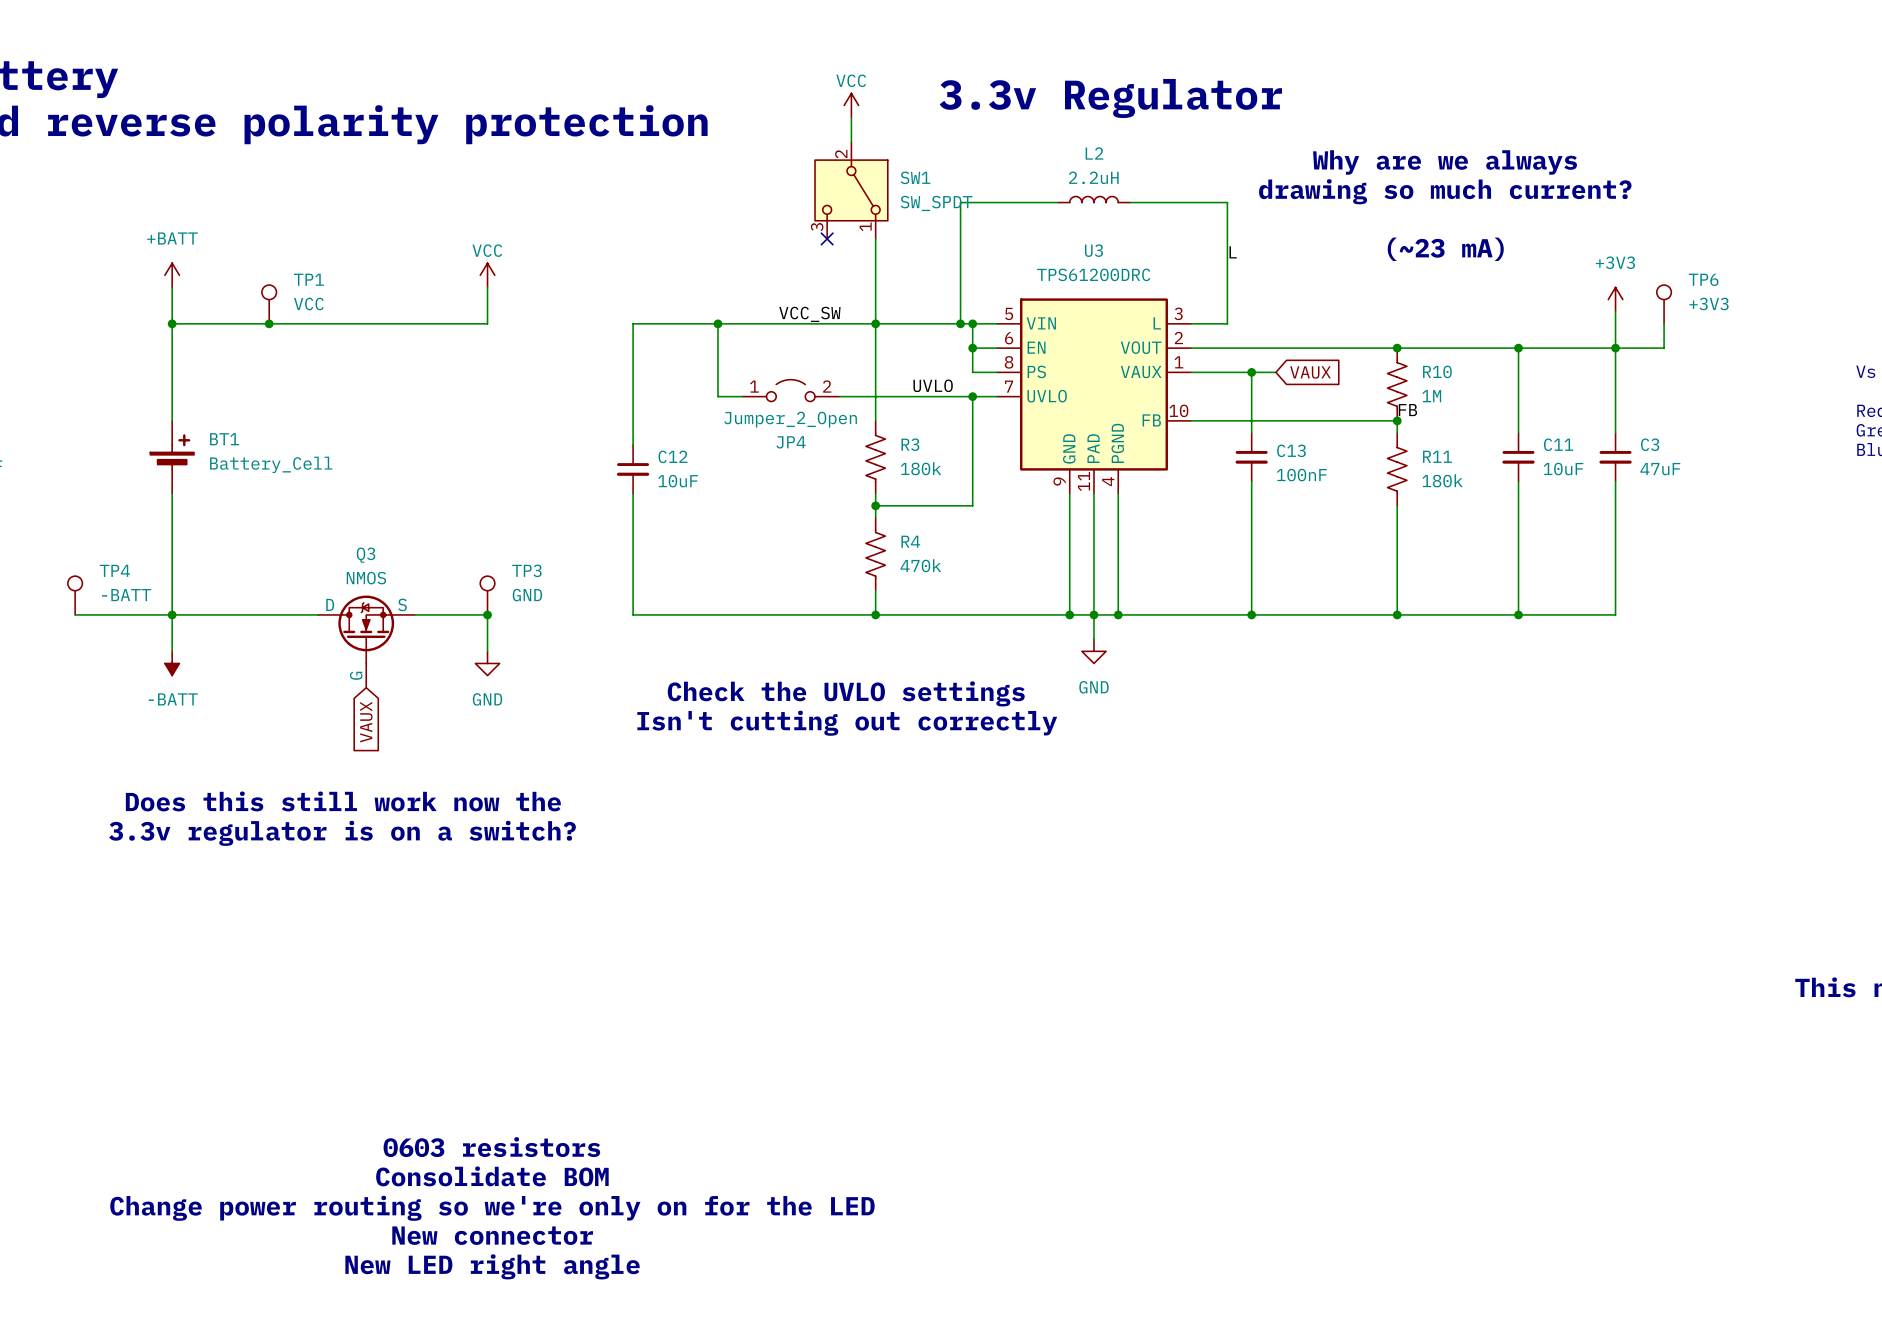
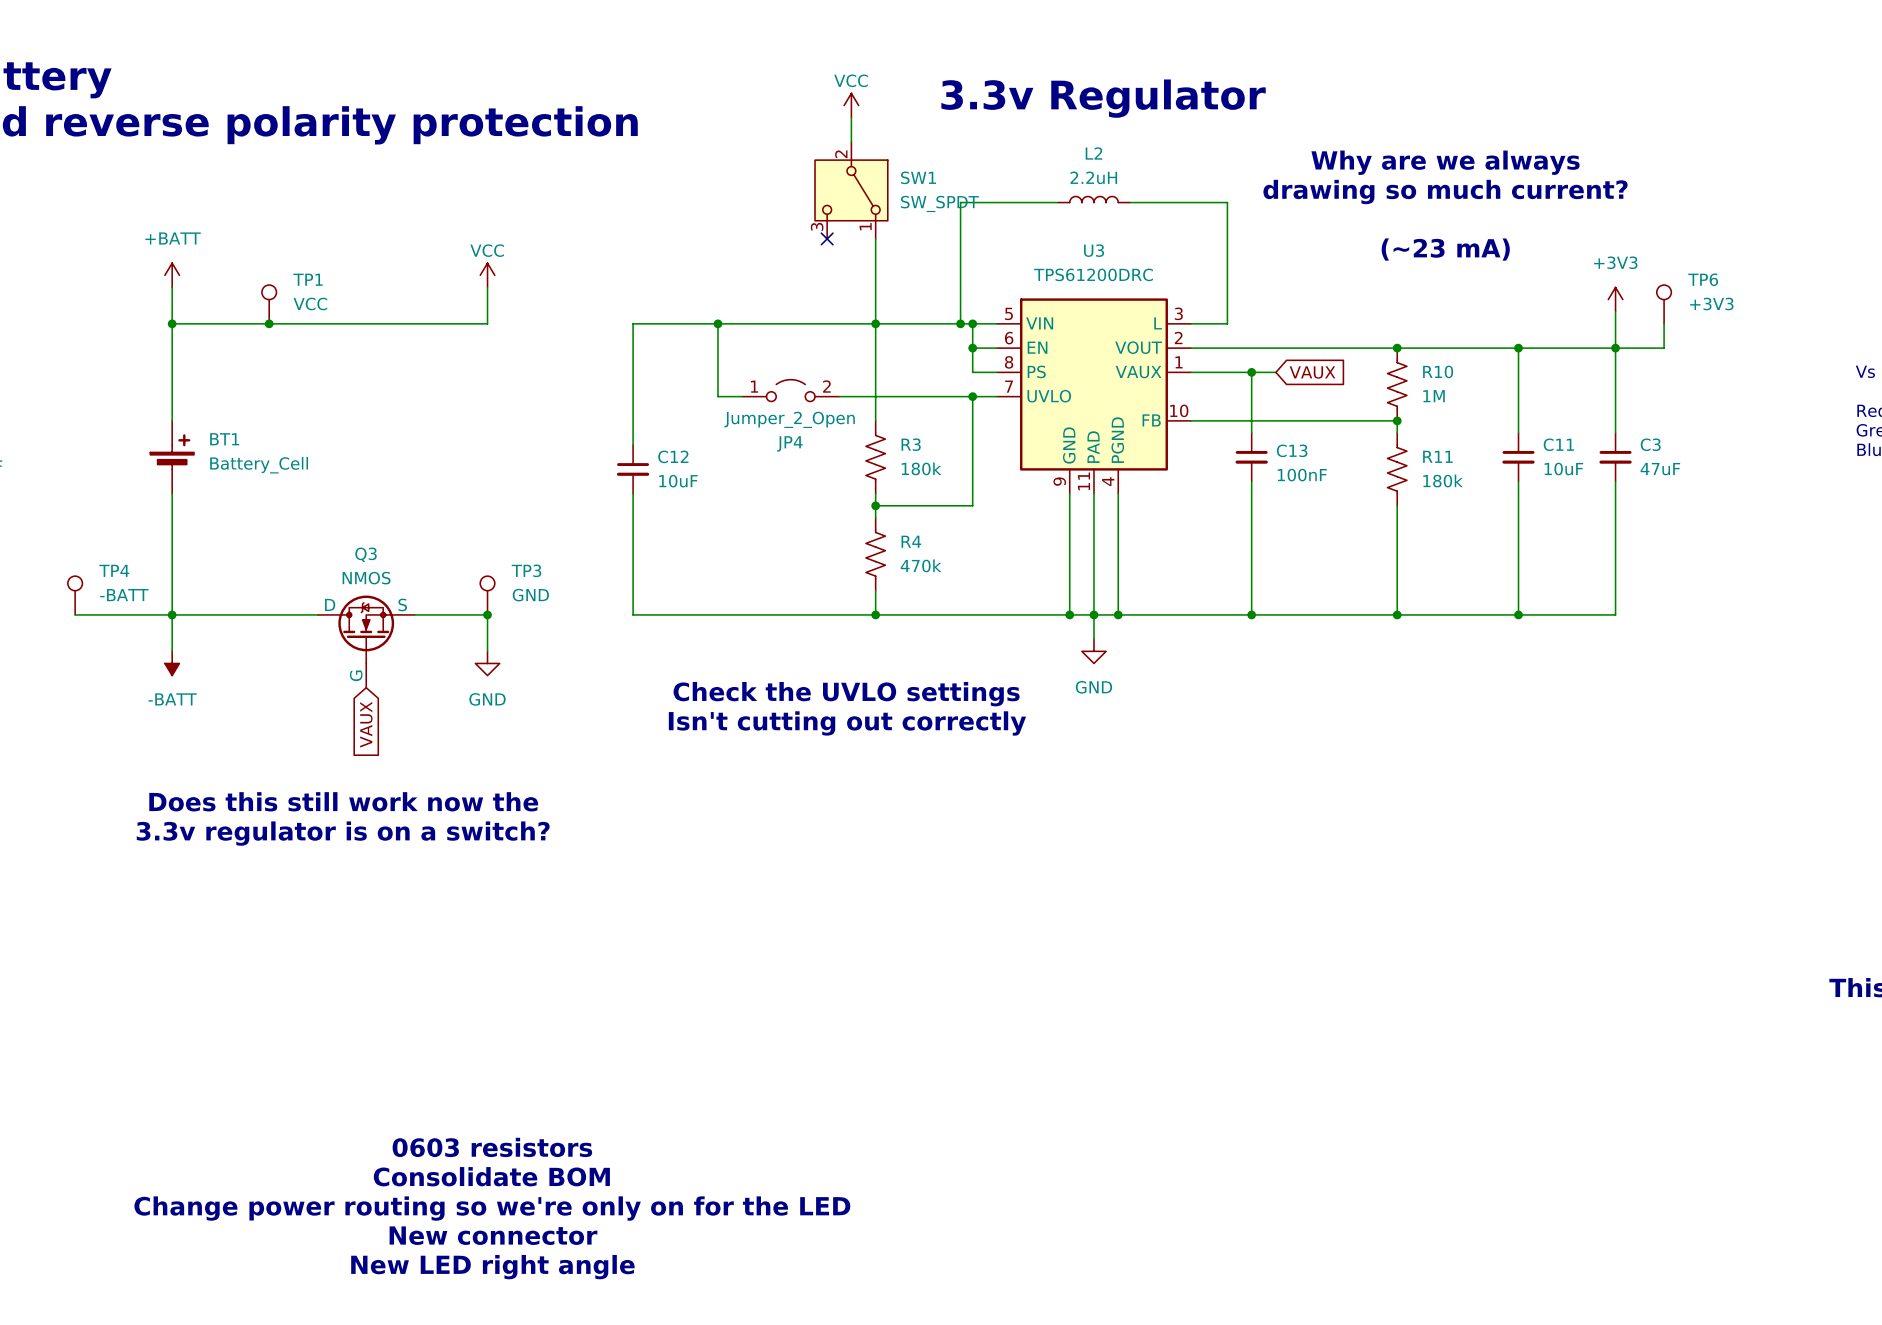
label: L (1233, 252) -> none
label: VCC_SW (809, 314) -> none
label: UVLO (933, 385) -> none
label: FB (1407, 410) -> none

